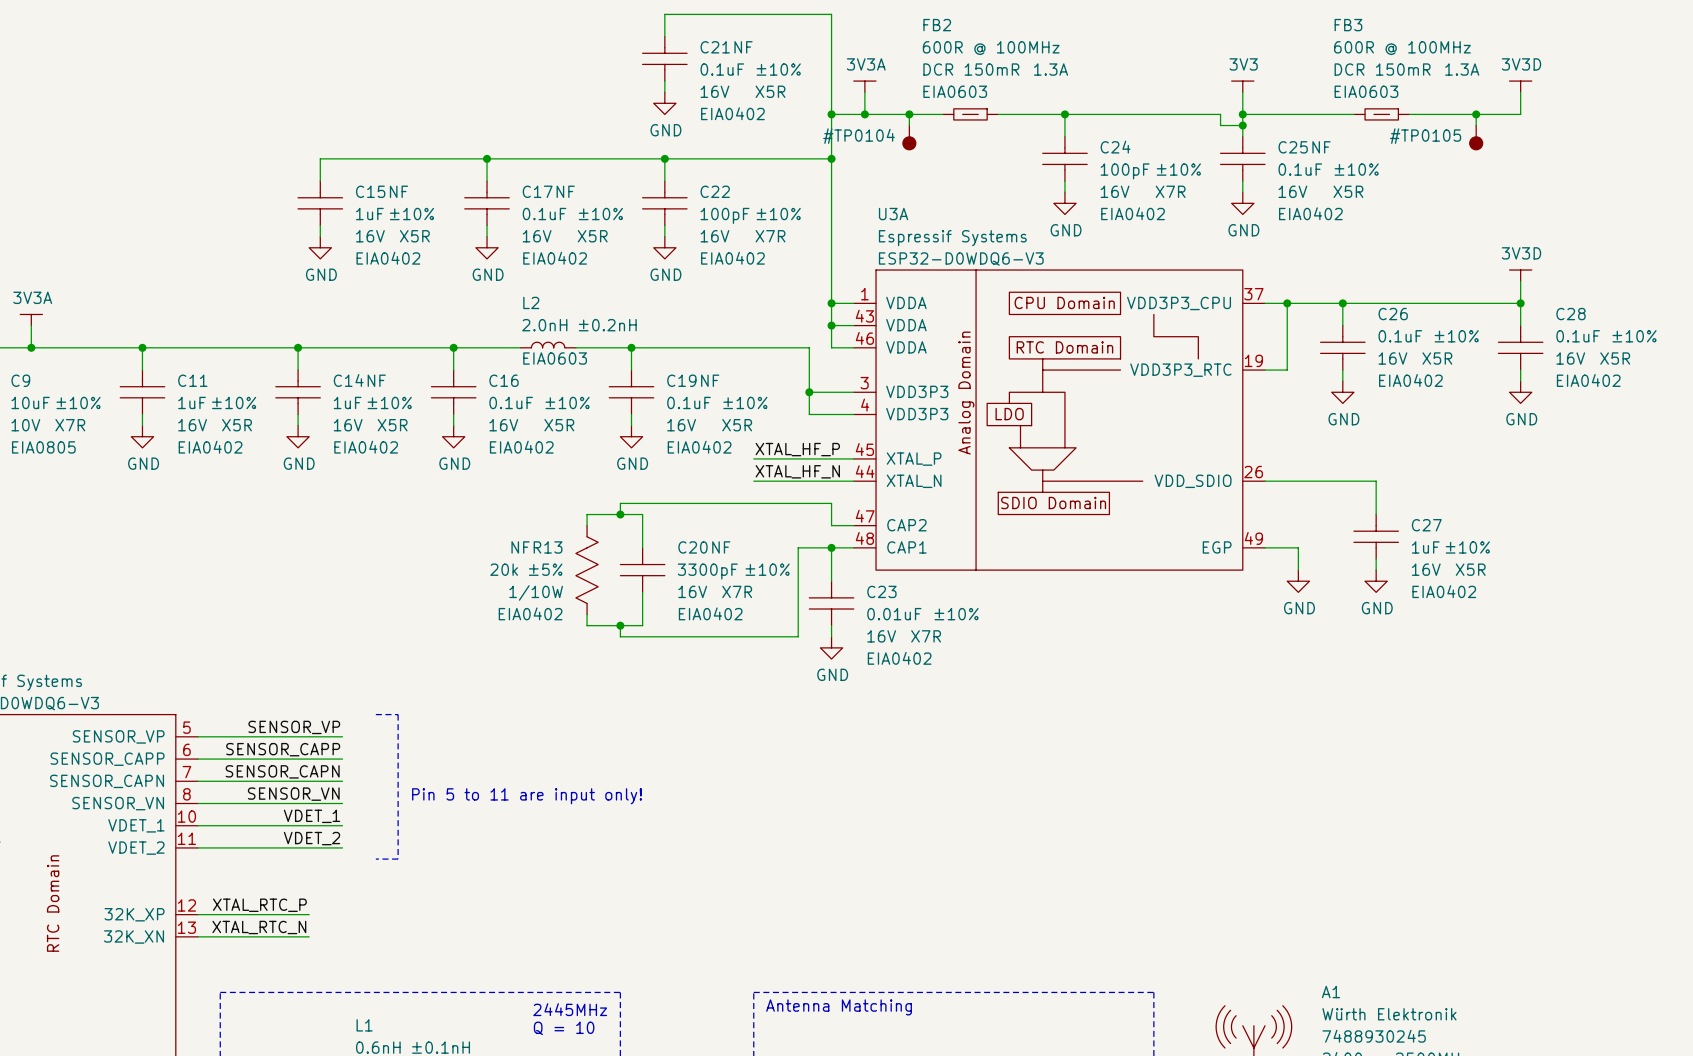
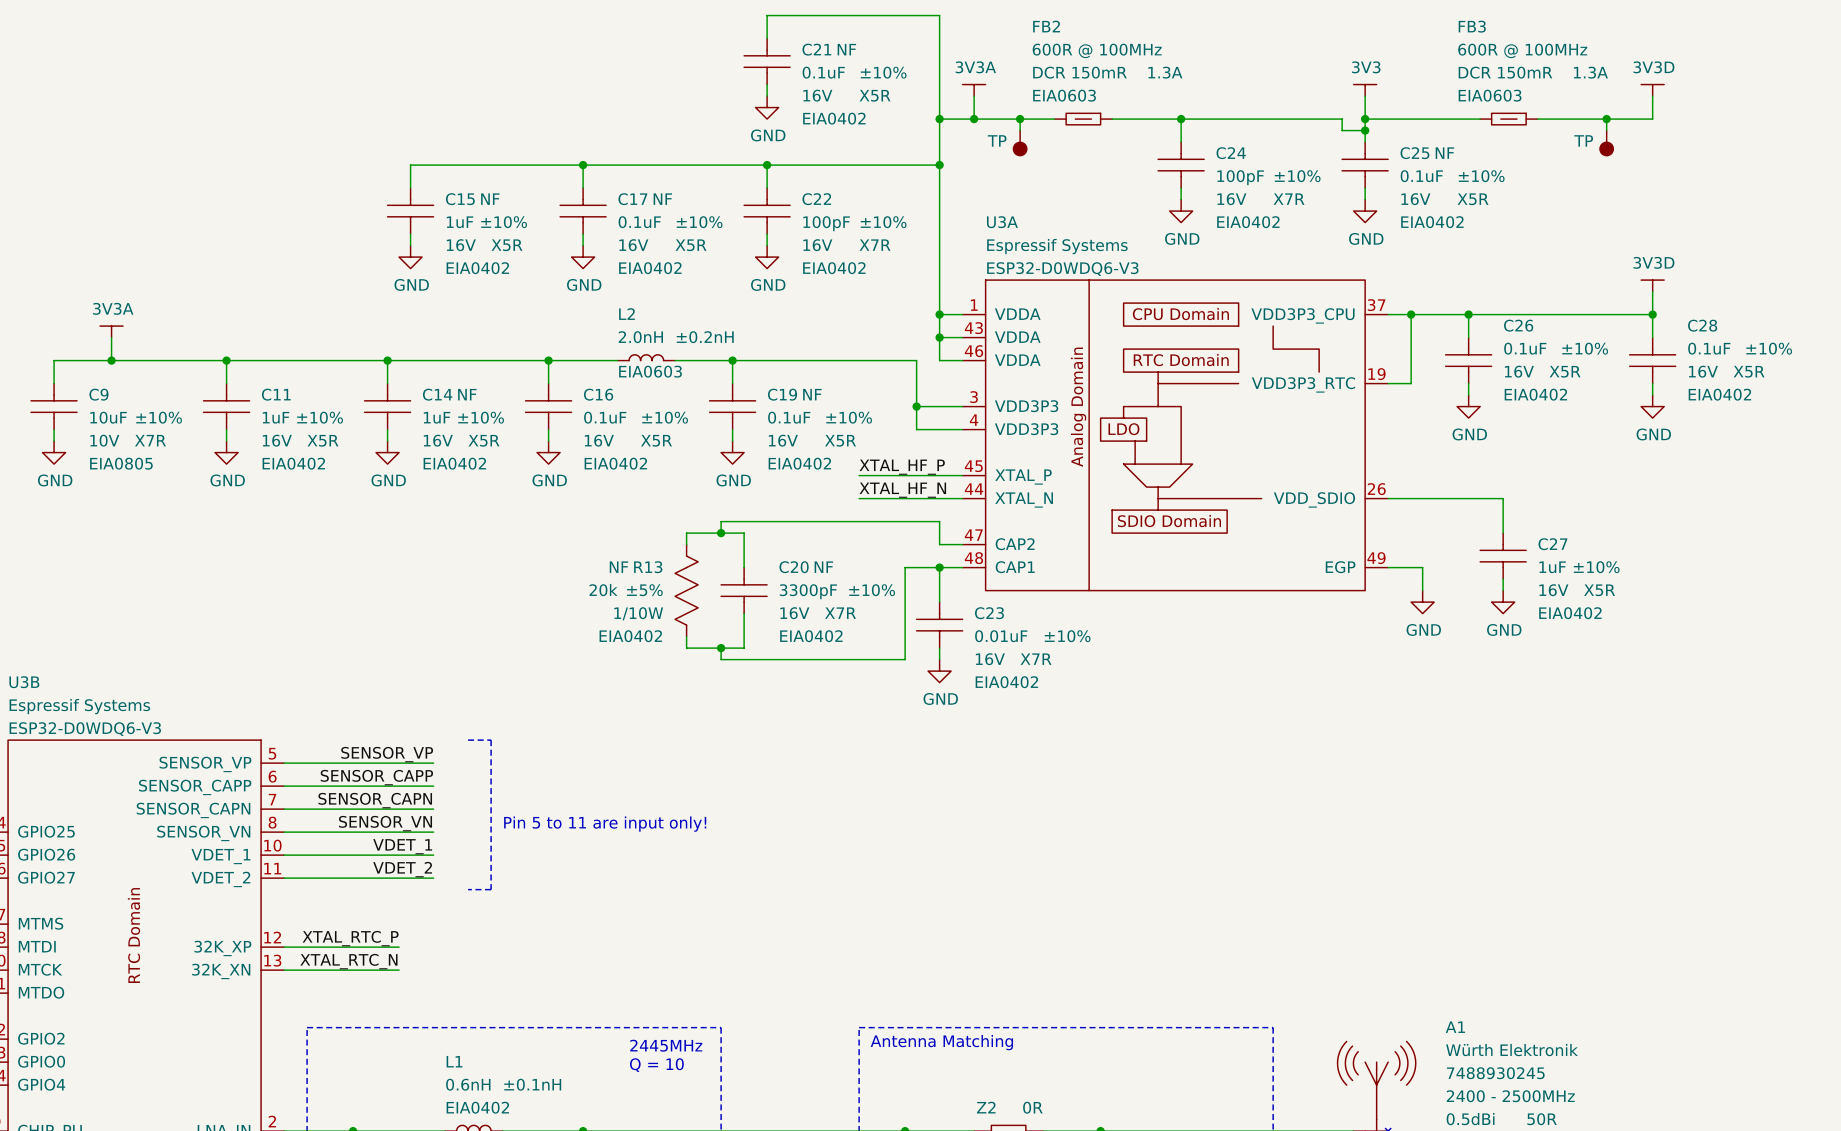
#TP0104: (909, 137) -> none
TP: none -> (1020, 143)
#TP0105: (1476, 137) -> none
TP: none -> (1606, 143)

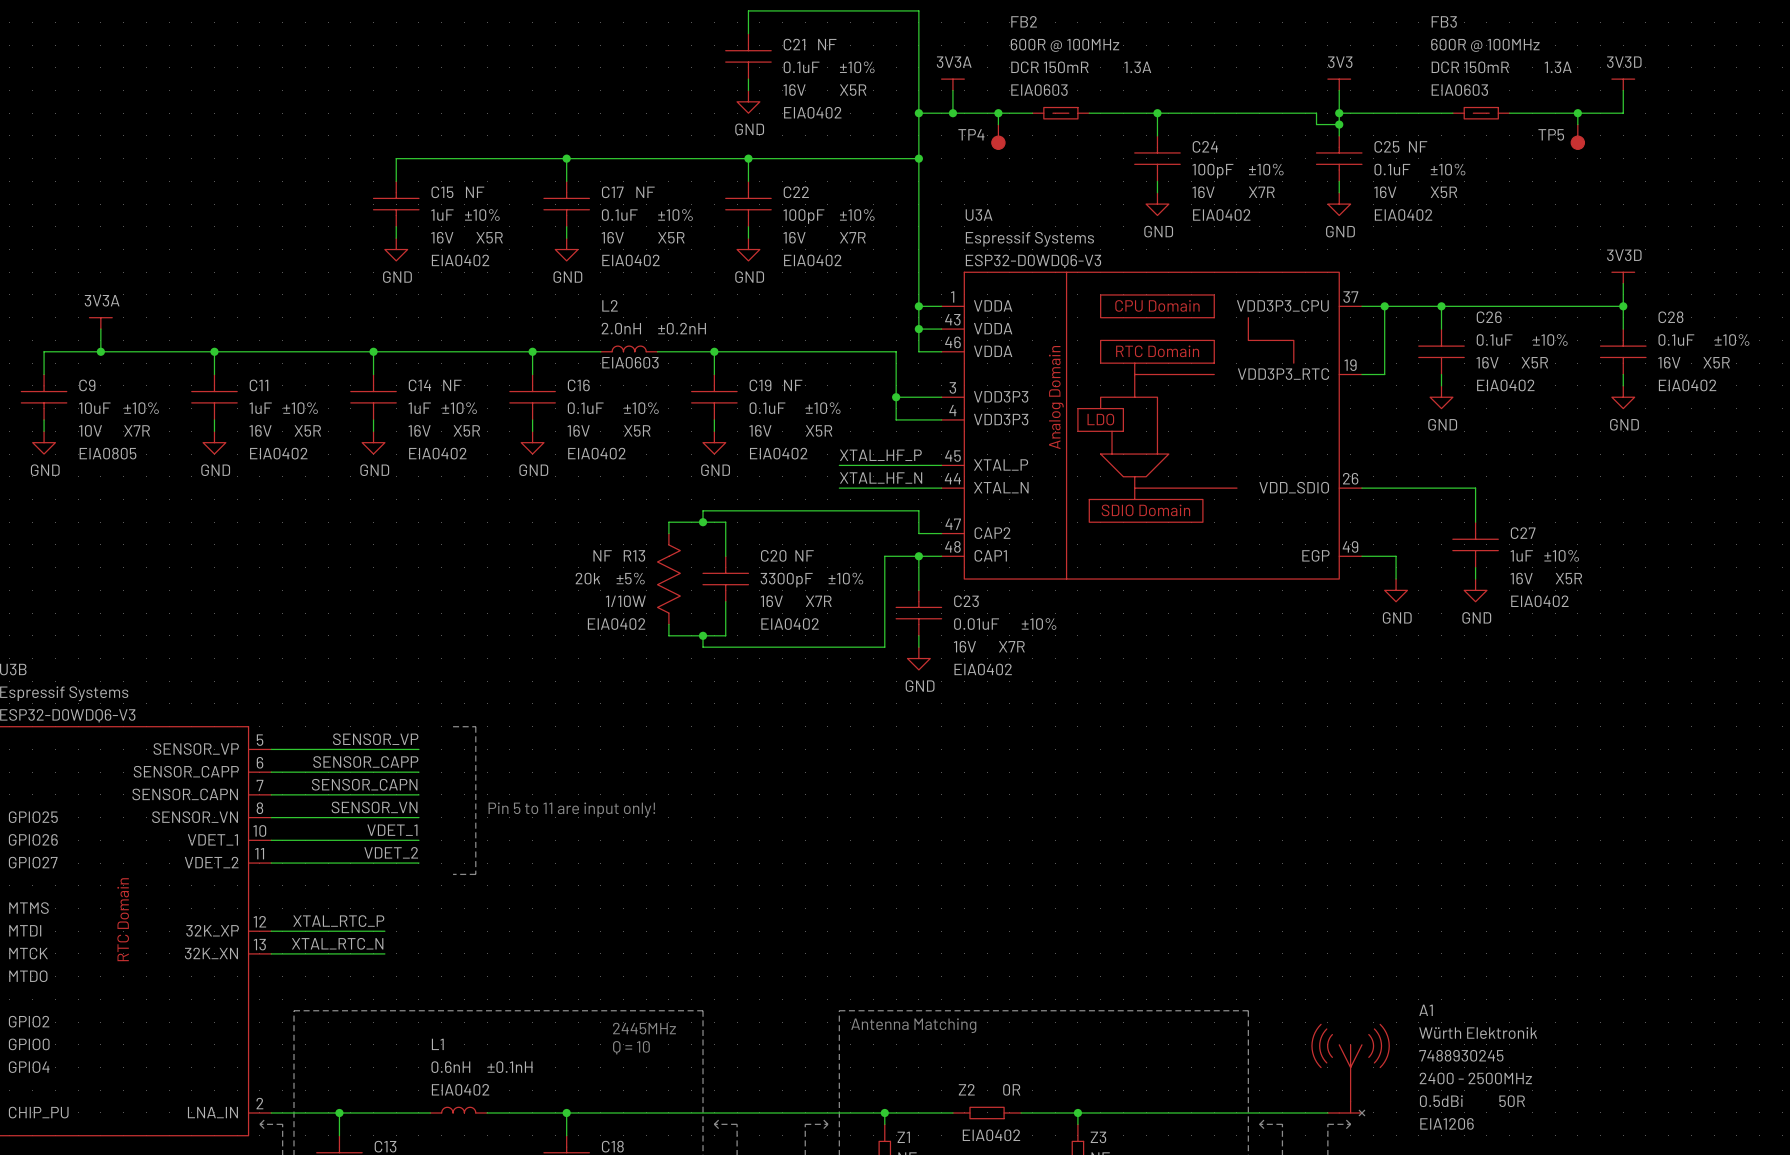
TP name: TP (997, 140) -> TP4 (971, 134)
TP name: TP (1583, 140) -> TP5 (1551, 134)

